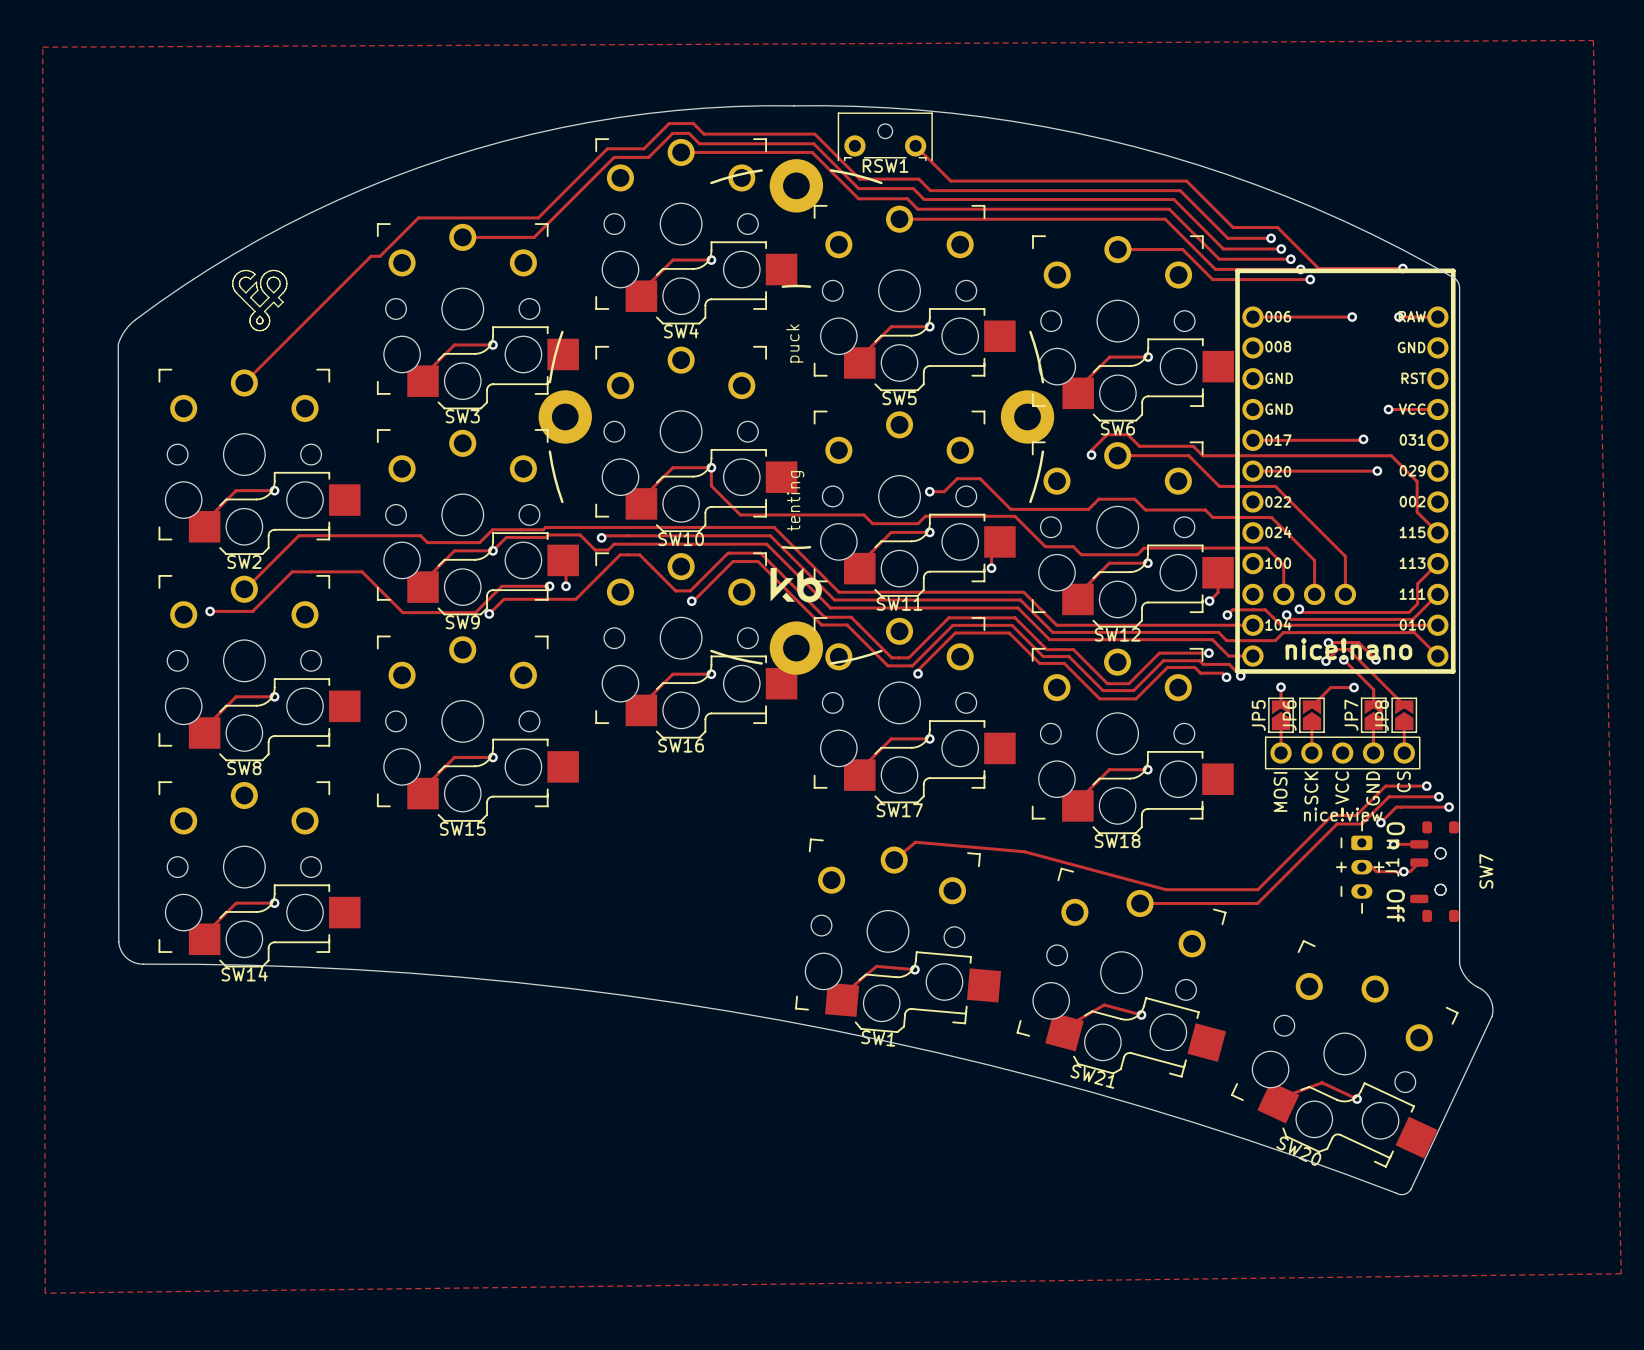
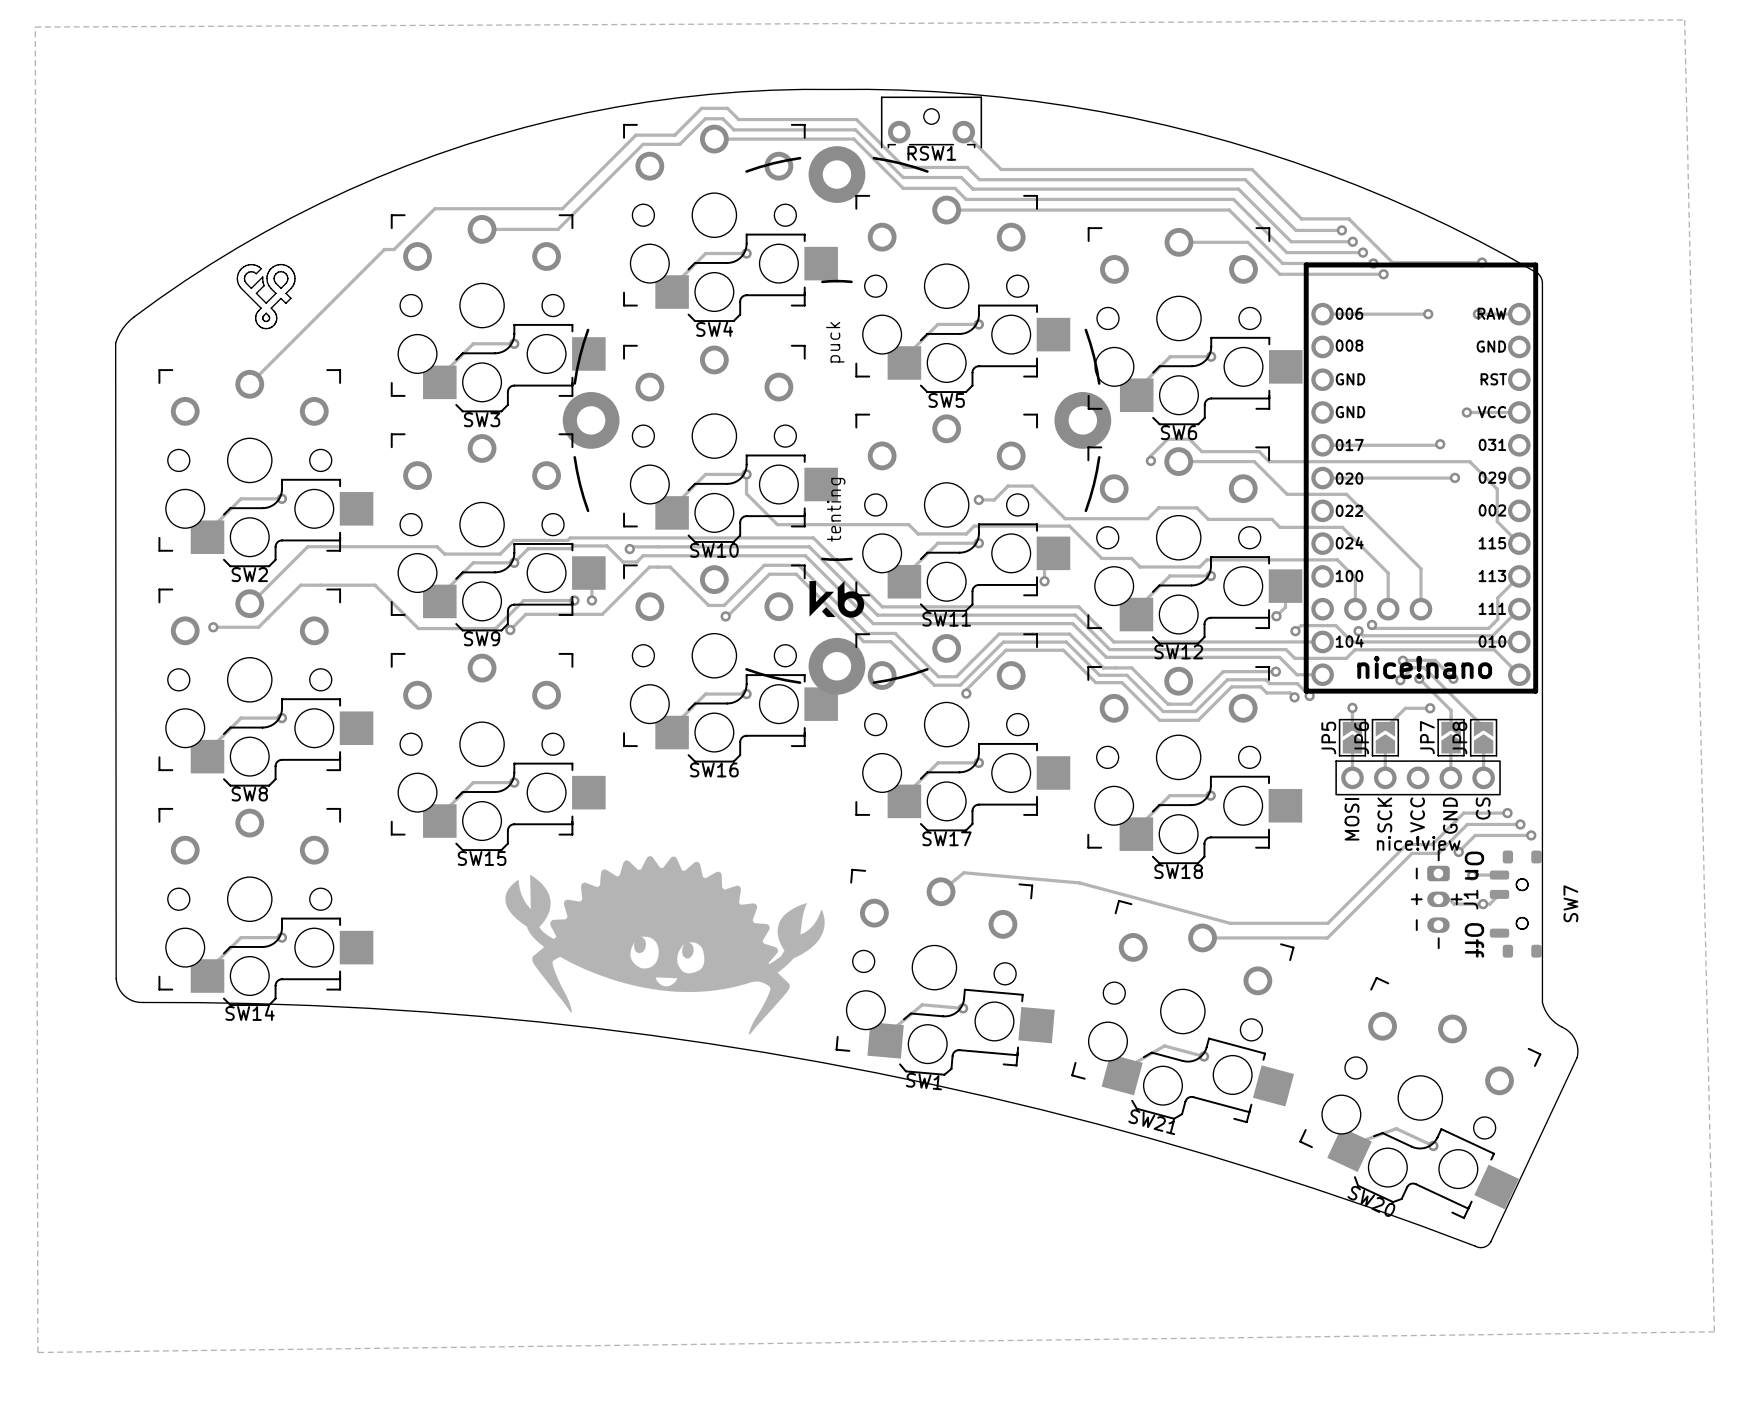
drawing: none -> [505, 856, 825, 1035]

